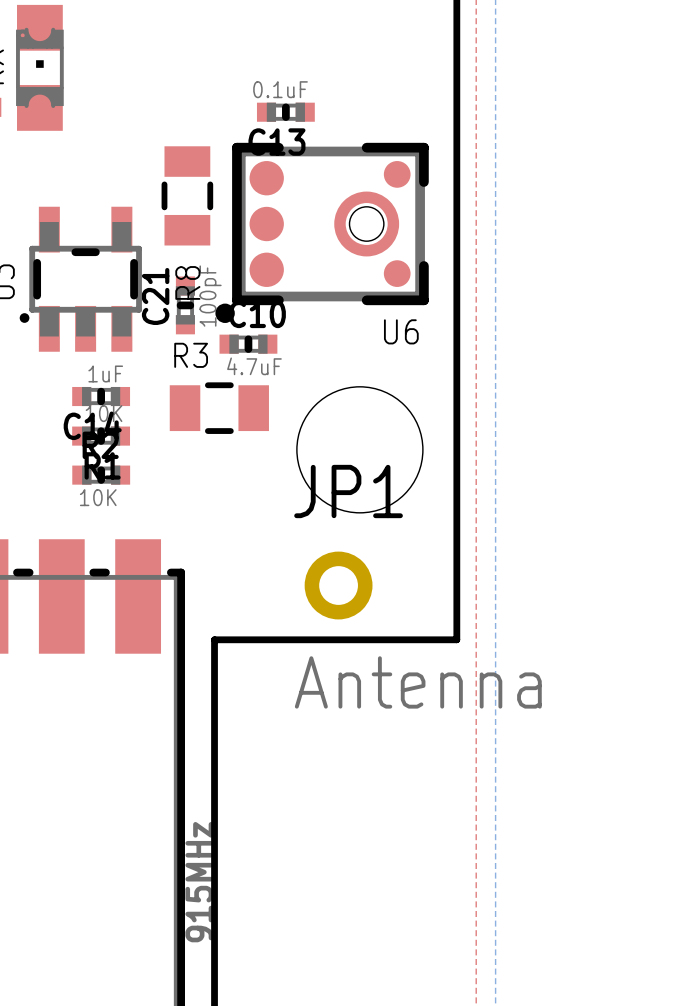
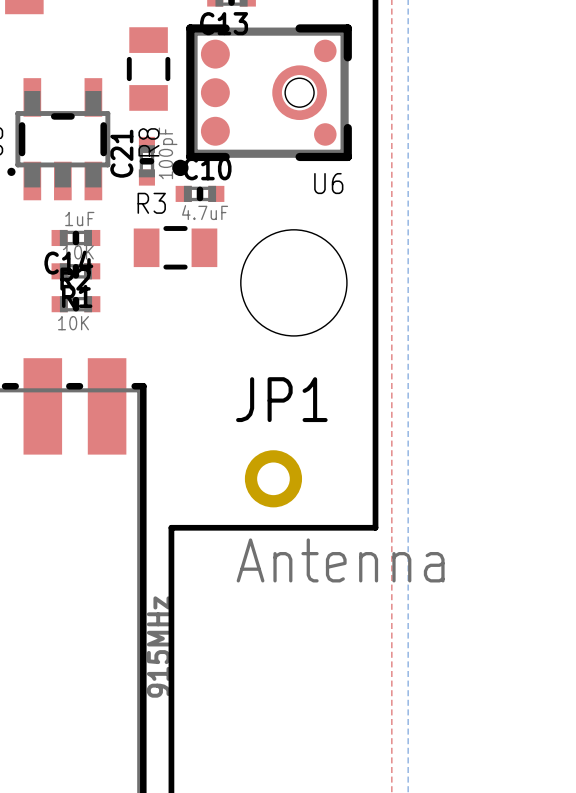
JP1 position: (338, 585) -> (273, 478)
board edge: (456, 639) (214, 639) (214, 740) -> (375, 442) (375, 527) (171, 527)

